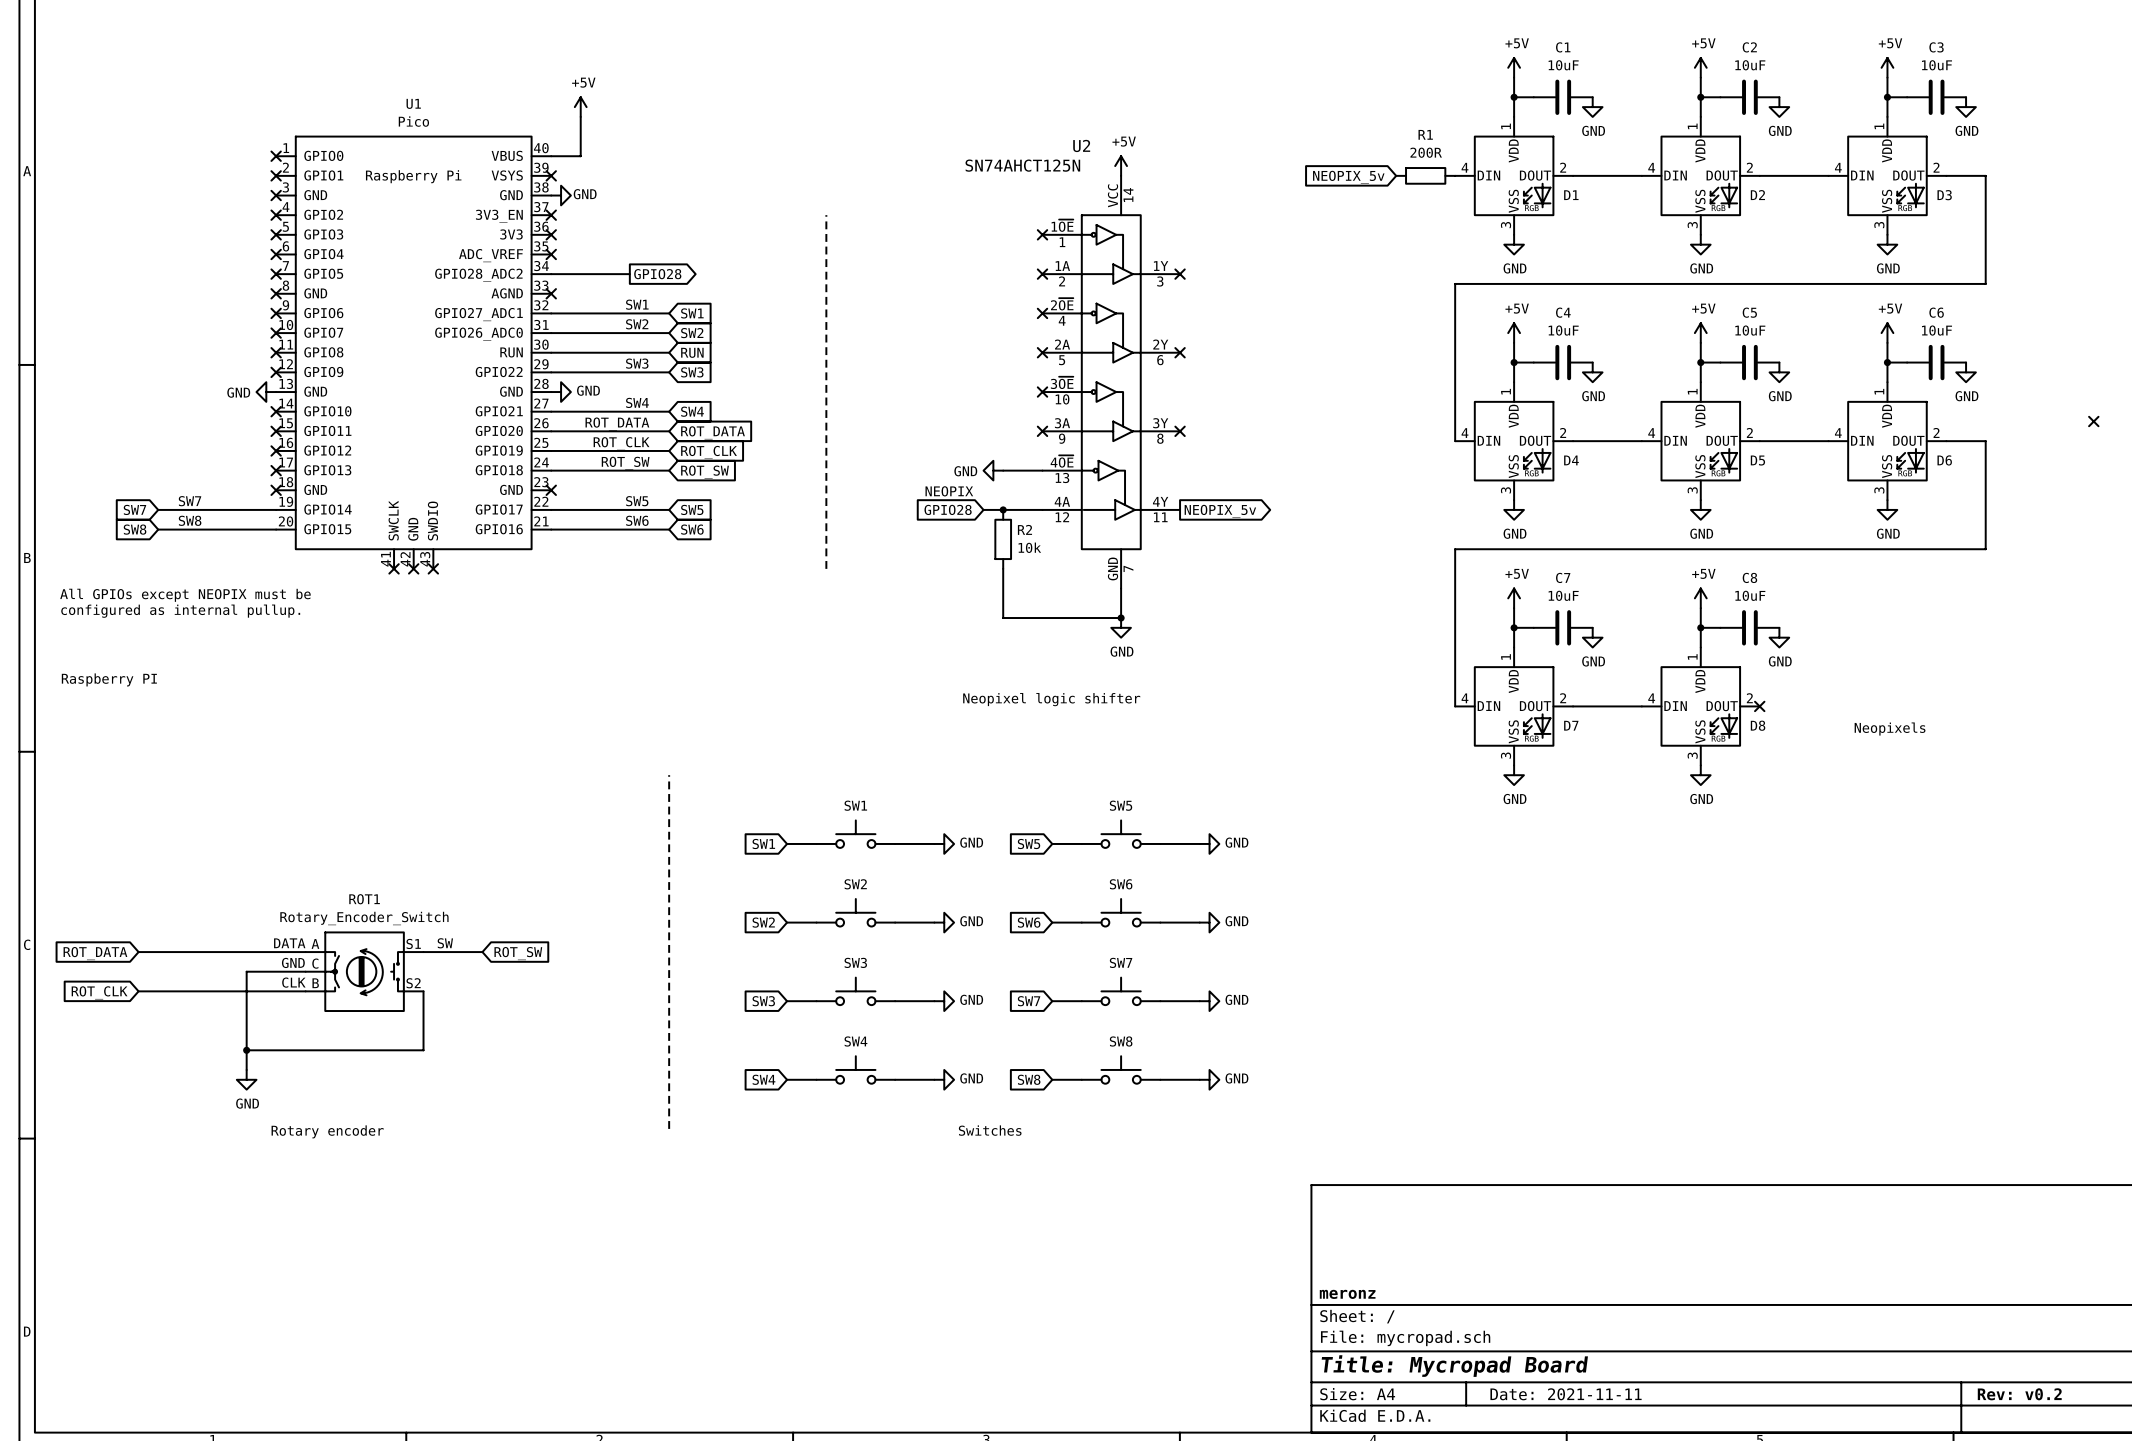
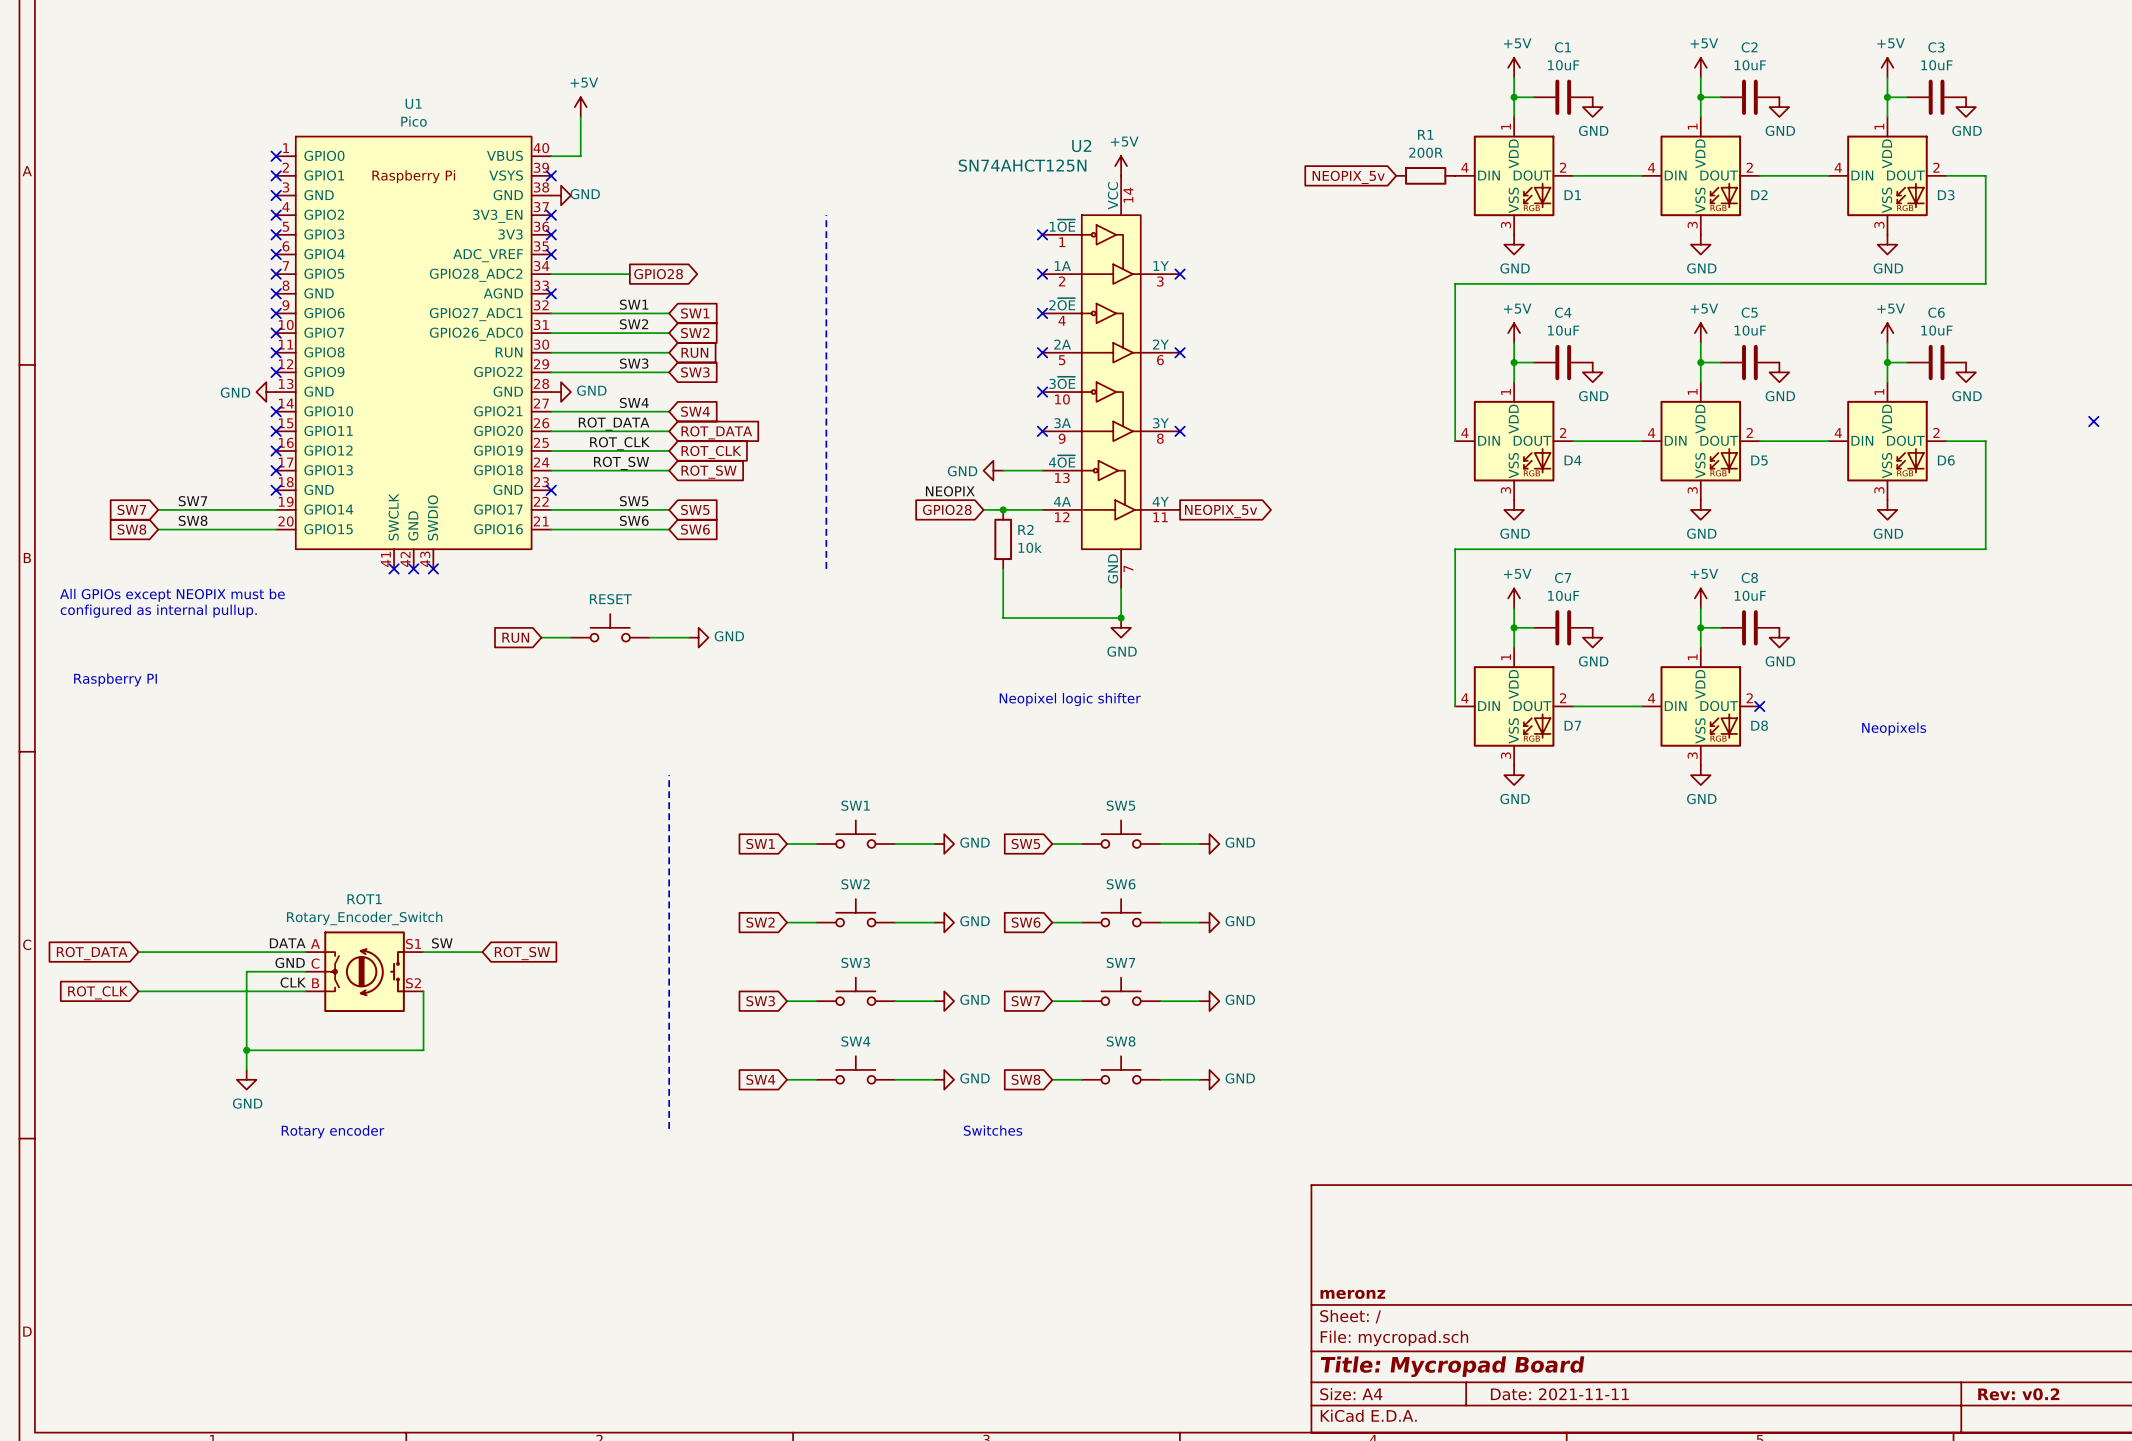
part: none -> RESET (610, 627)
global label: none -> RUN (515, 637)
wire: none -> (541, 637) (570, 637)
wire: none -> (649, 637) (688, 637)
power symbol: none -> GND (698, 637)

